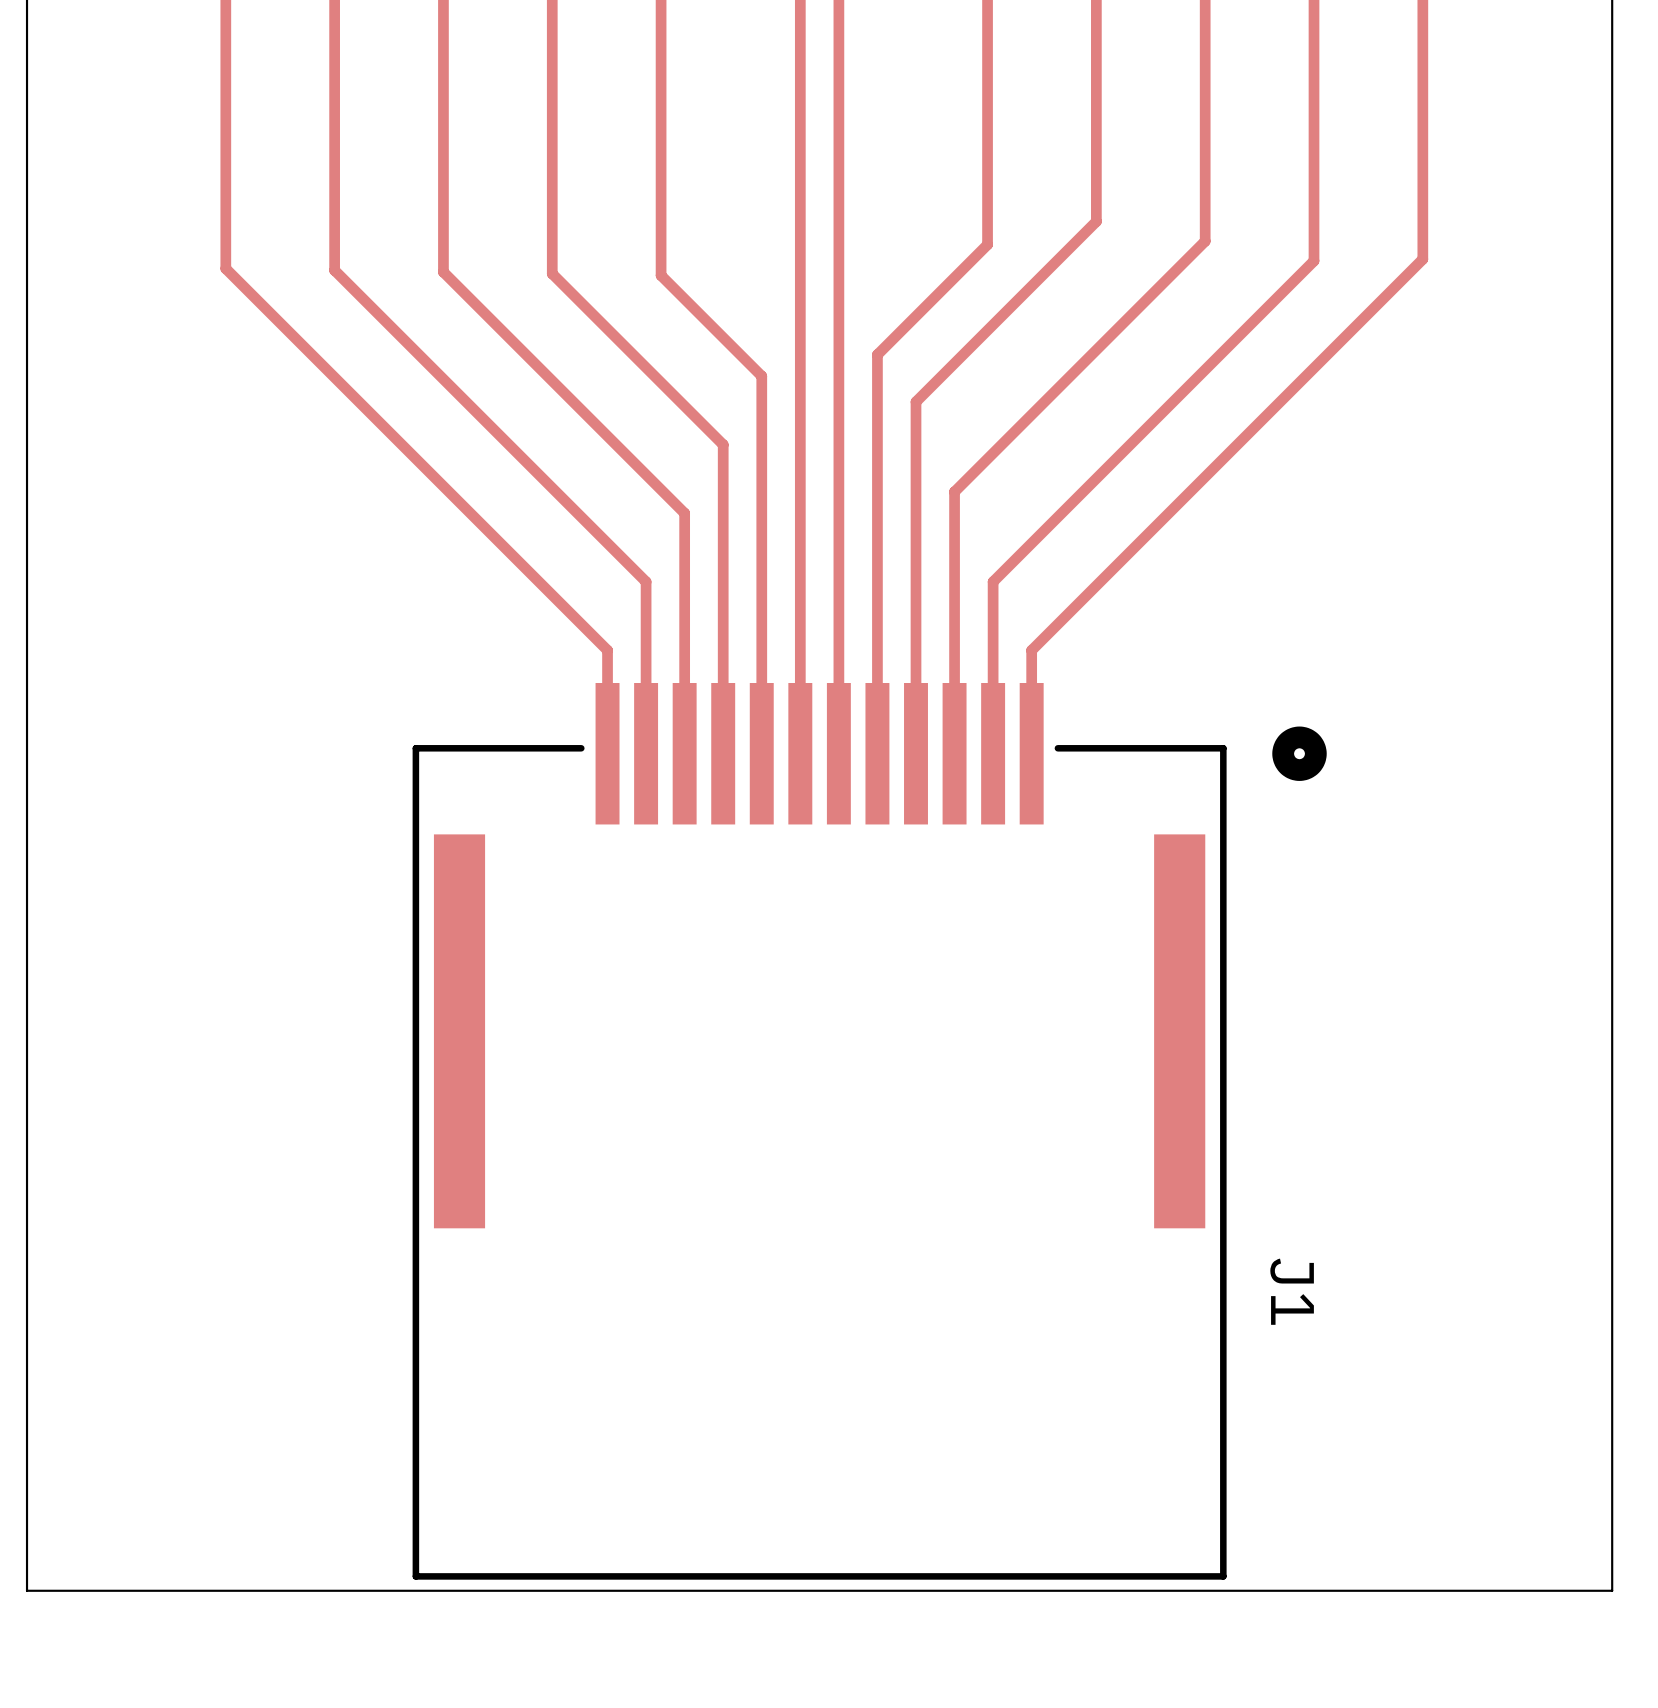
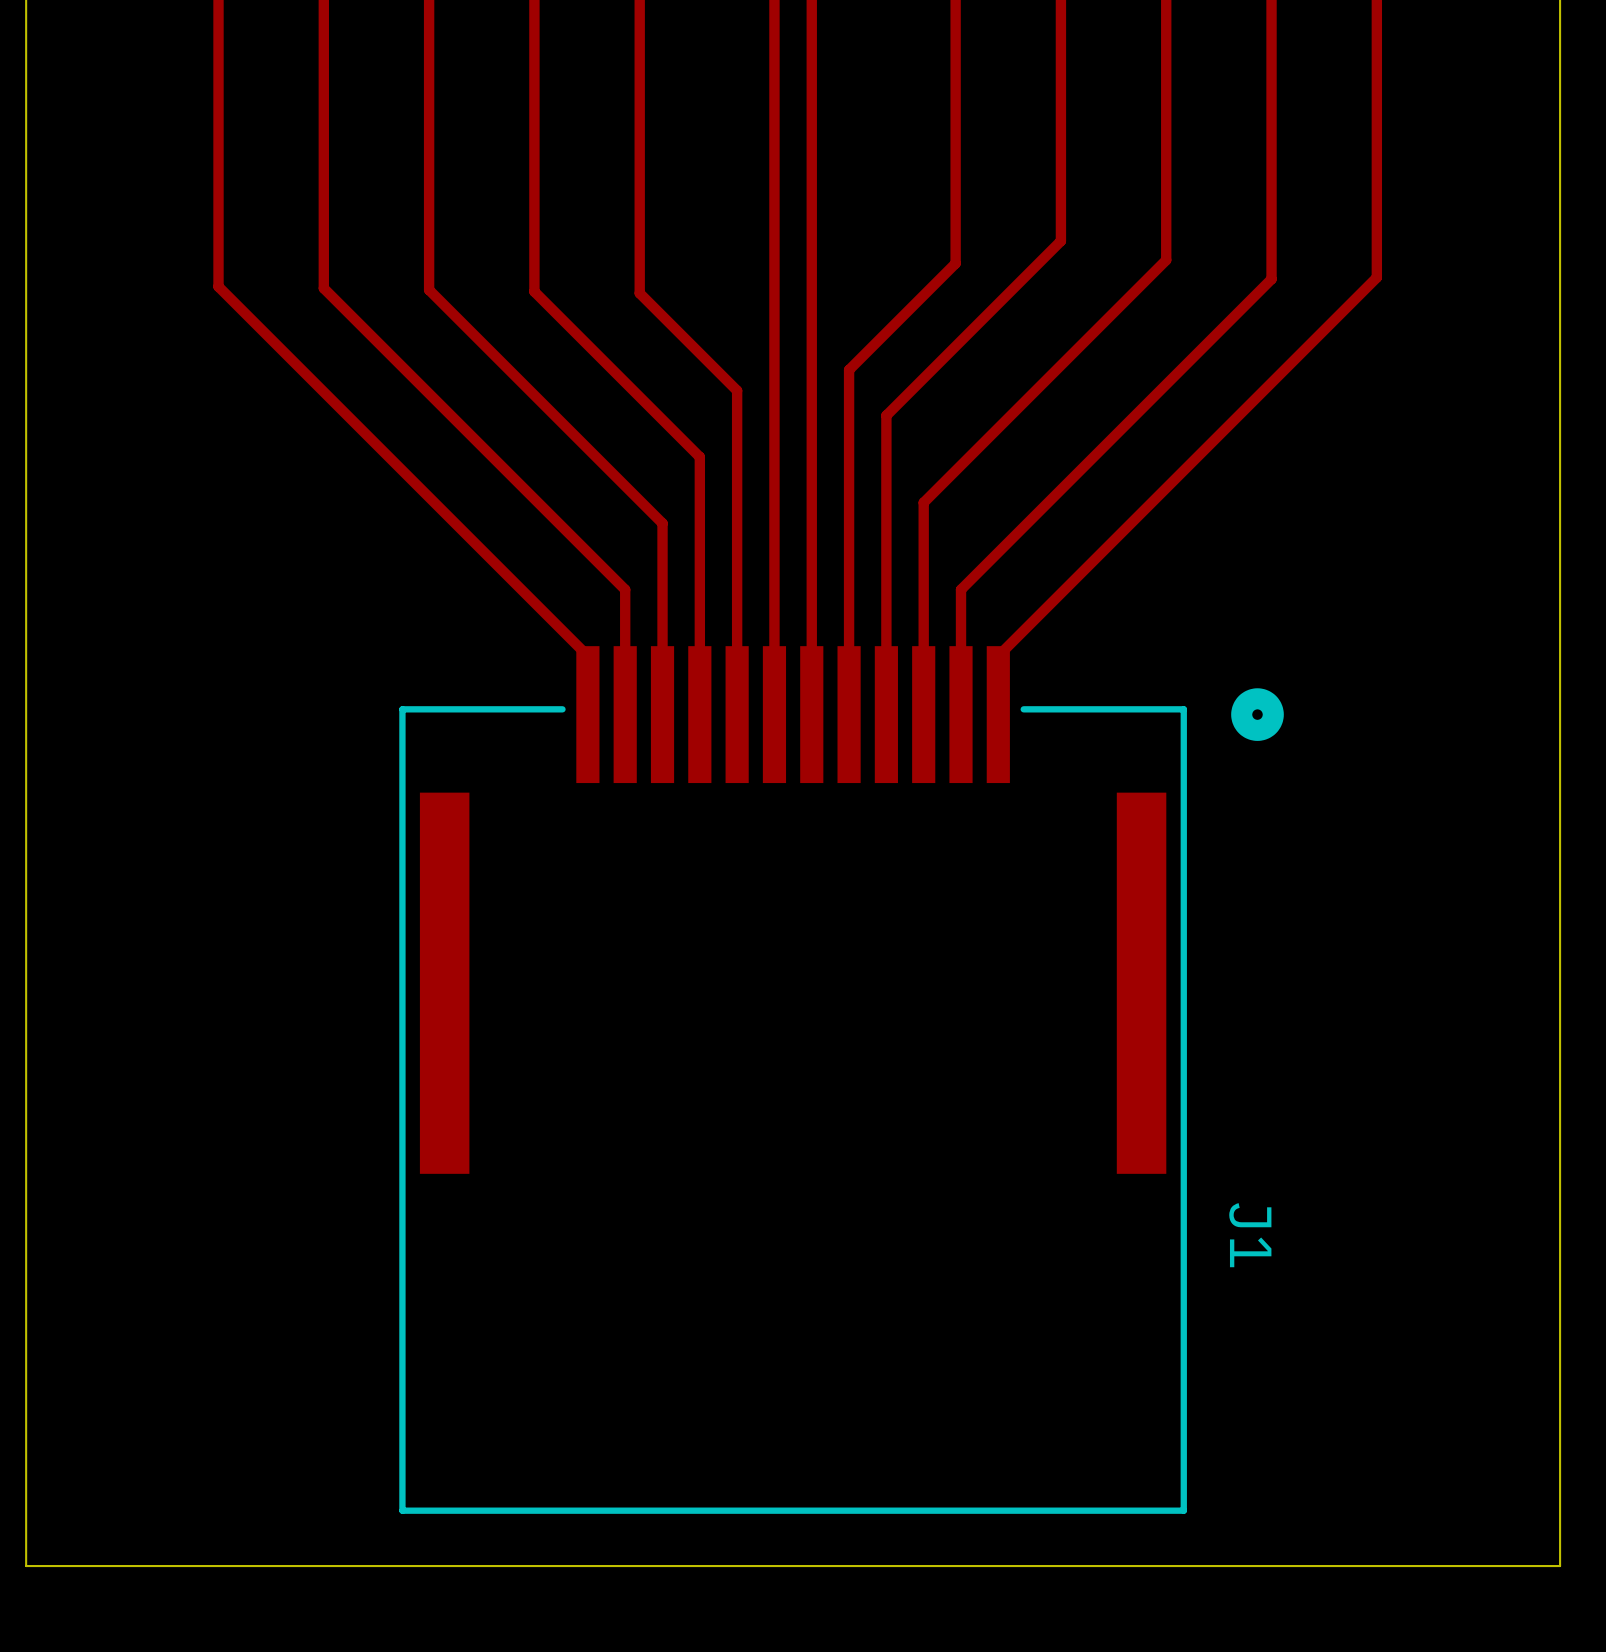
J1 position: (869, 1131) -> (841, 1080)

